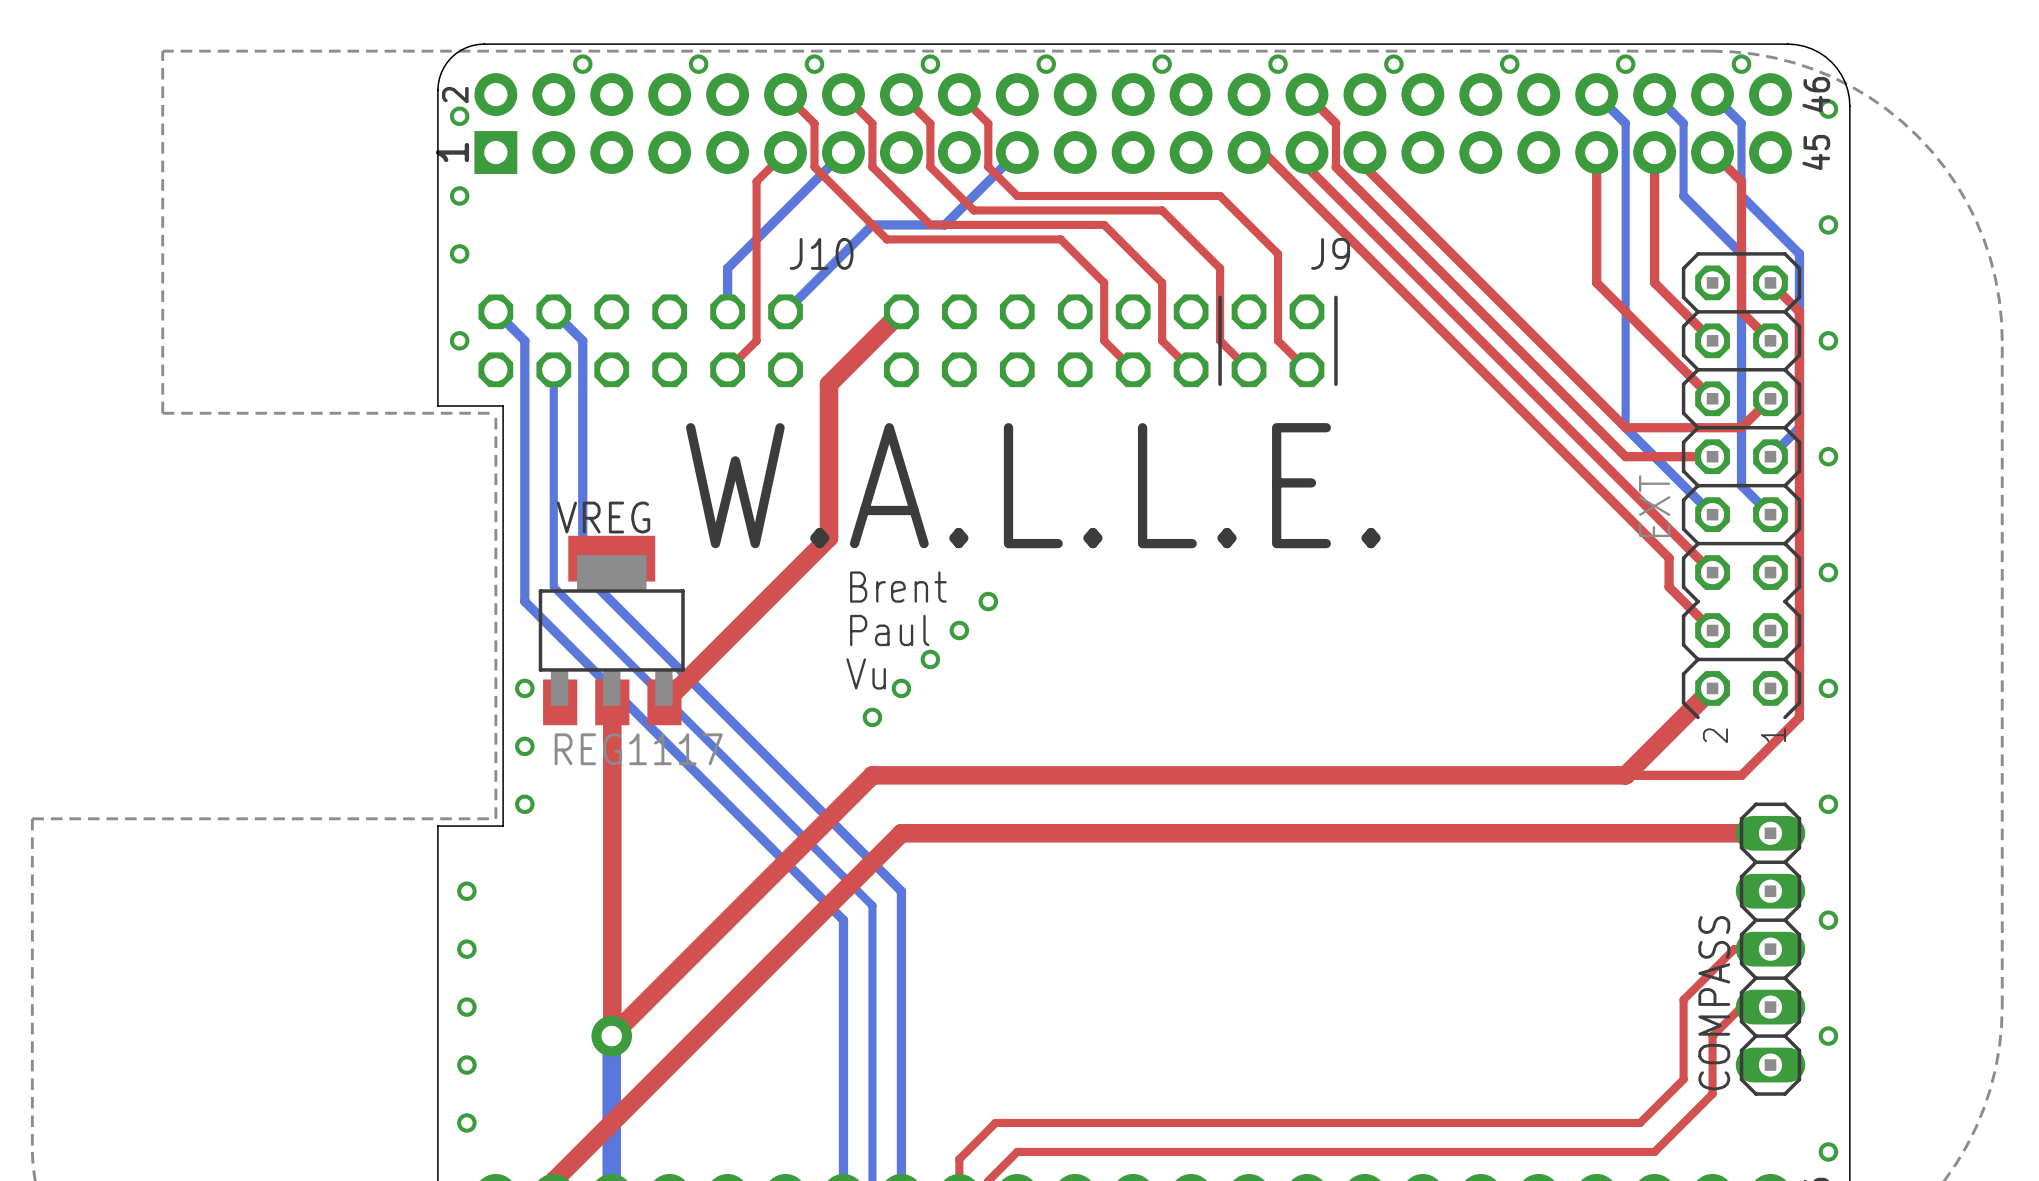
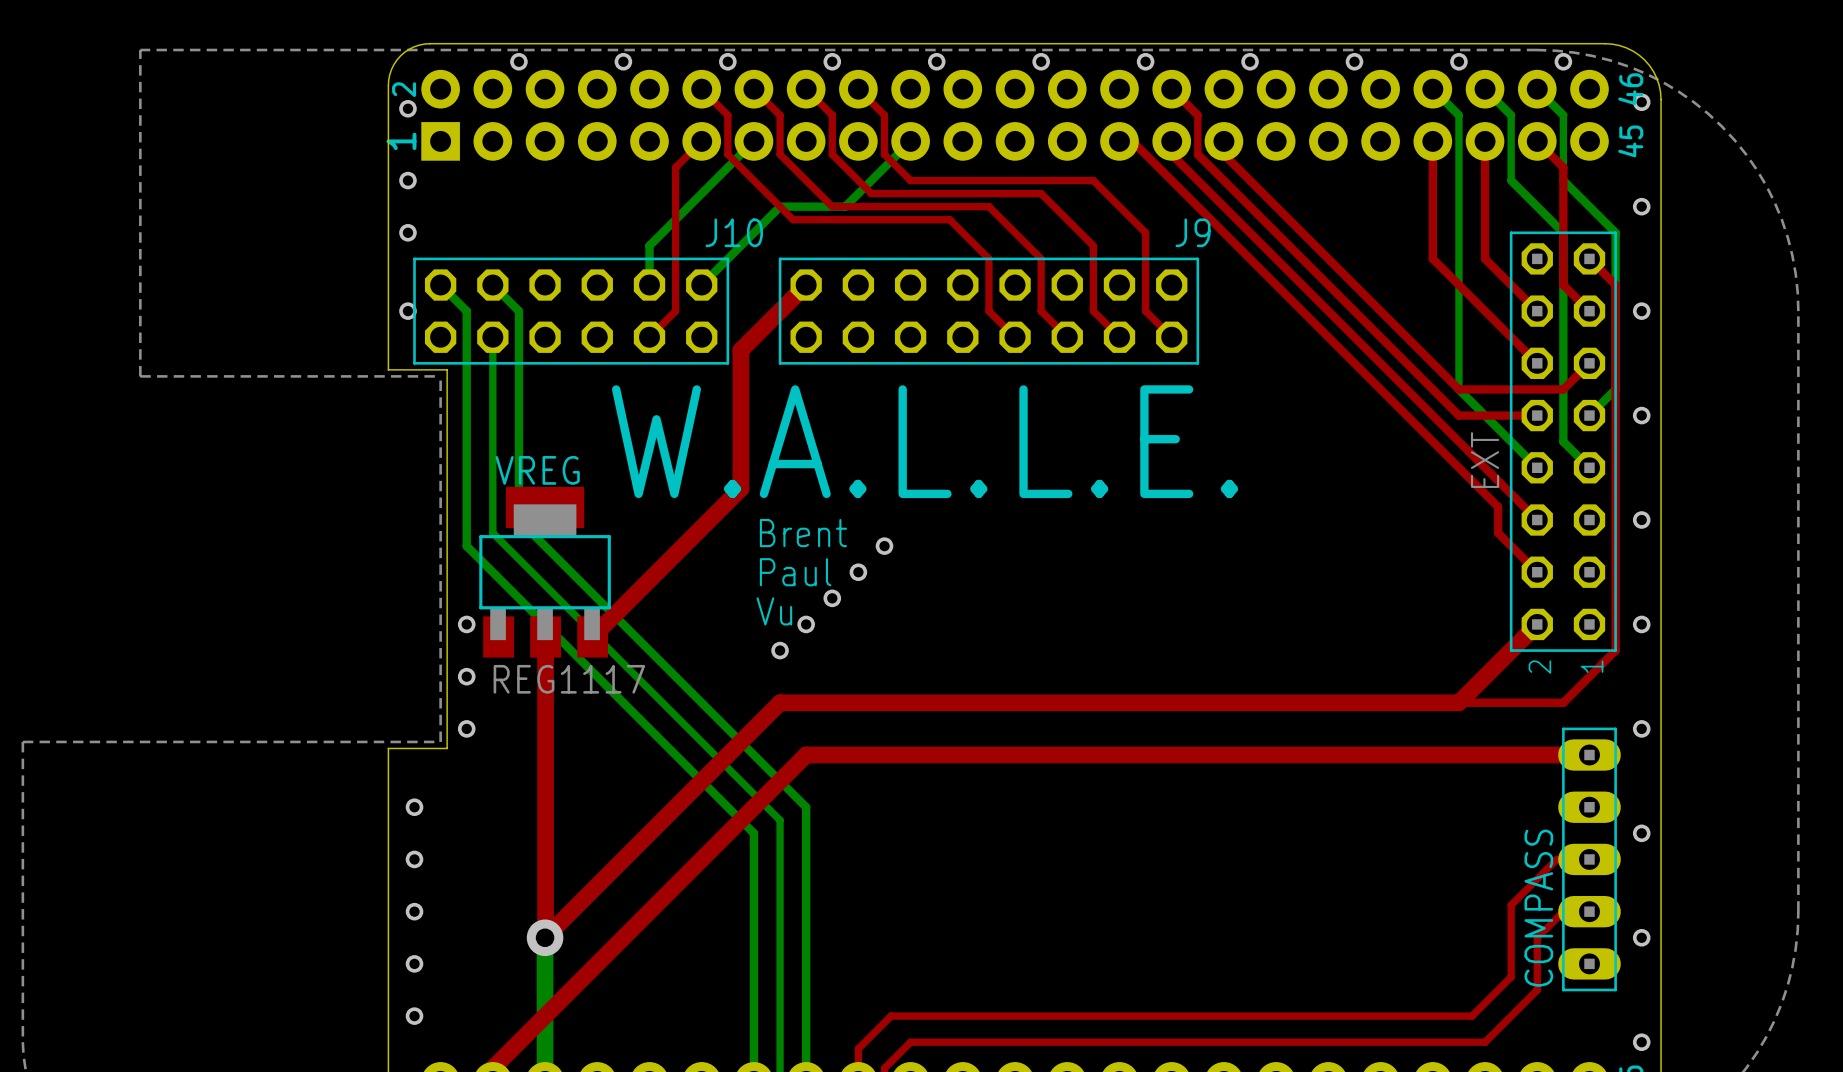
part footprint: [1681, 252, 1802, 720] -> [1509, 231, 1617, 652]
J10 footprint: [478, 294, 803, 388] -> [413, 257, 730, 365]
J9 footprint: [884, 294, 1338, 388] -> [778, 257, 1200, 365]
COMPASS footprint: [1735, 802, 1806, 1096] -> [1558, 727, 1621, 992]

